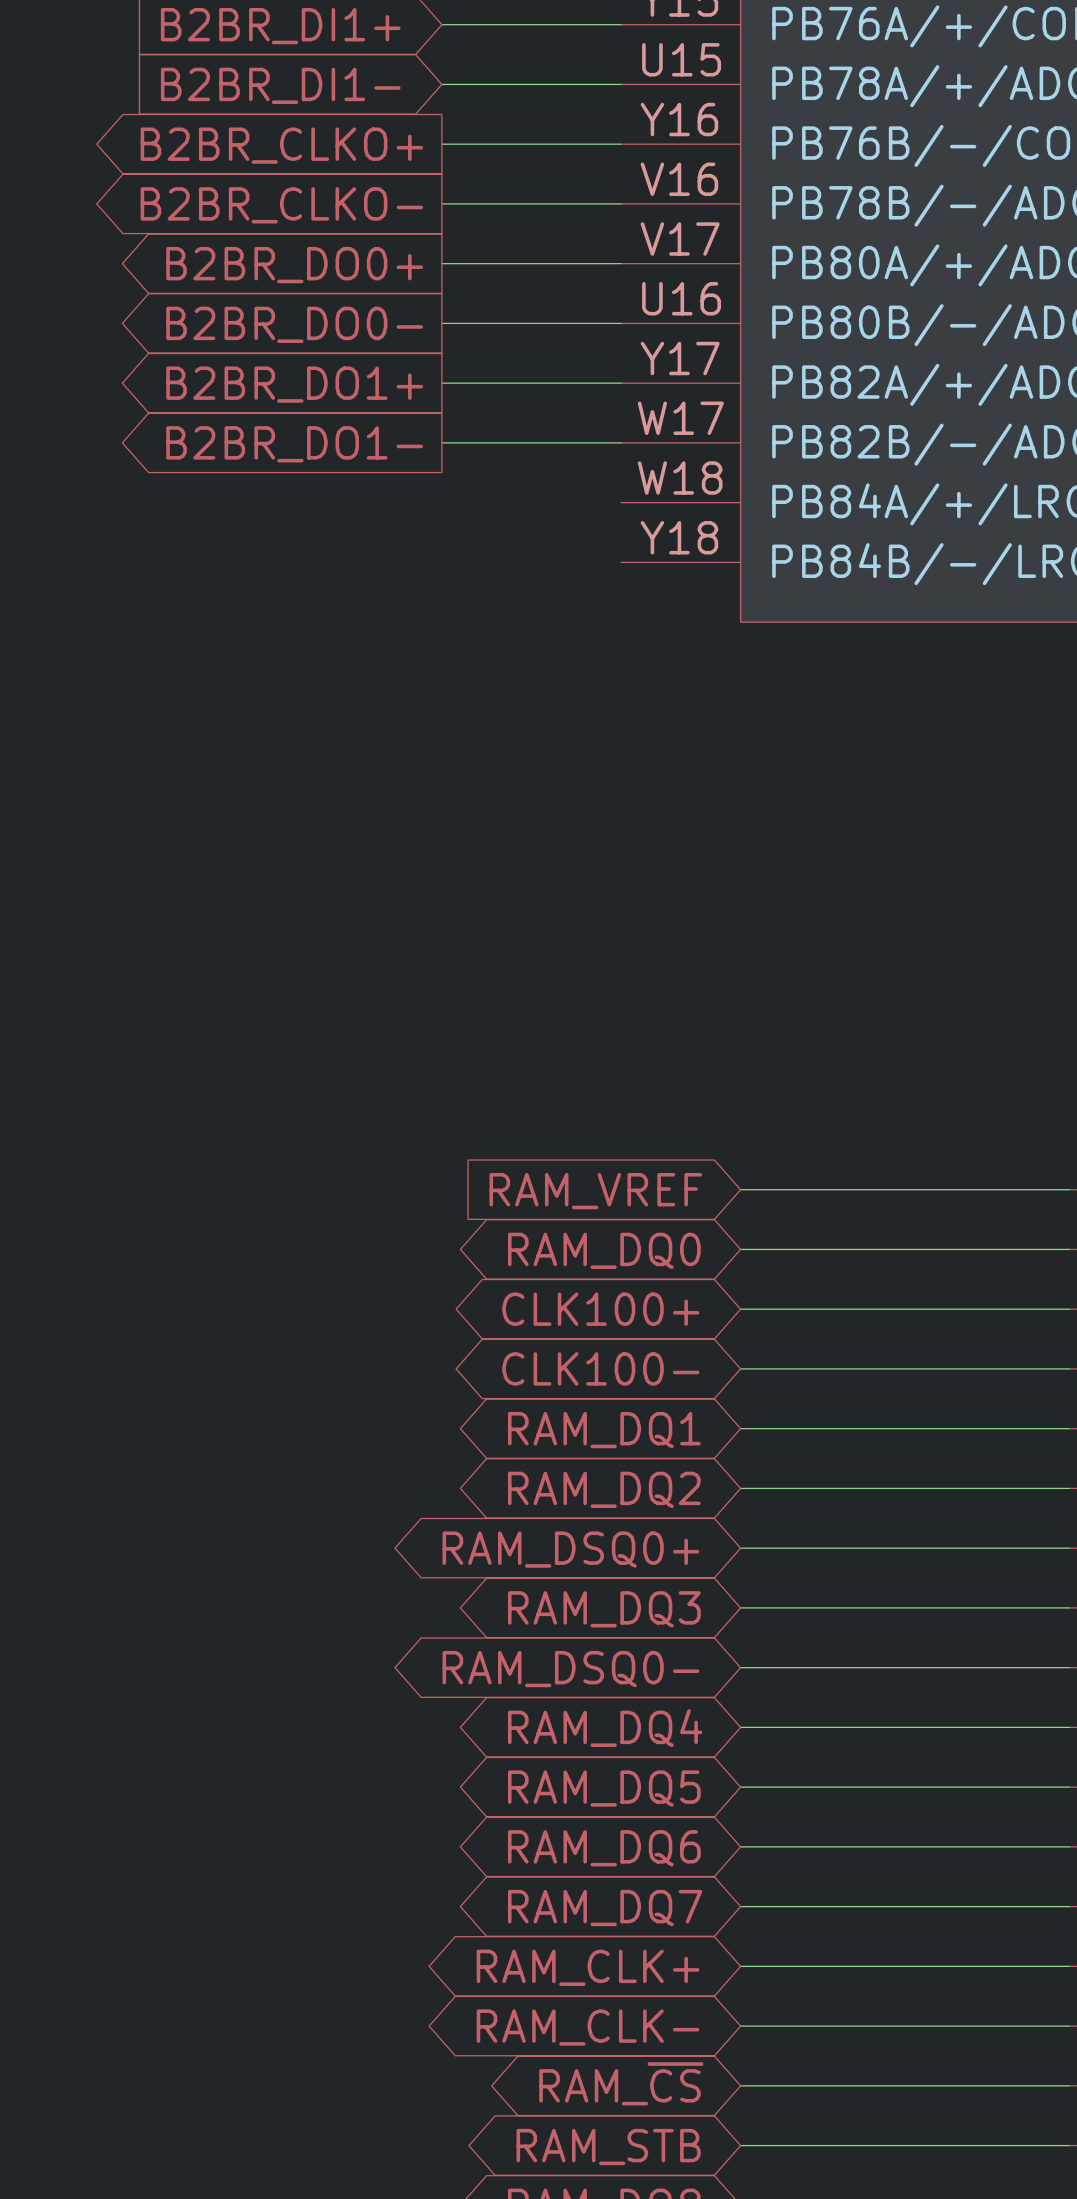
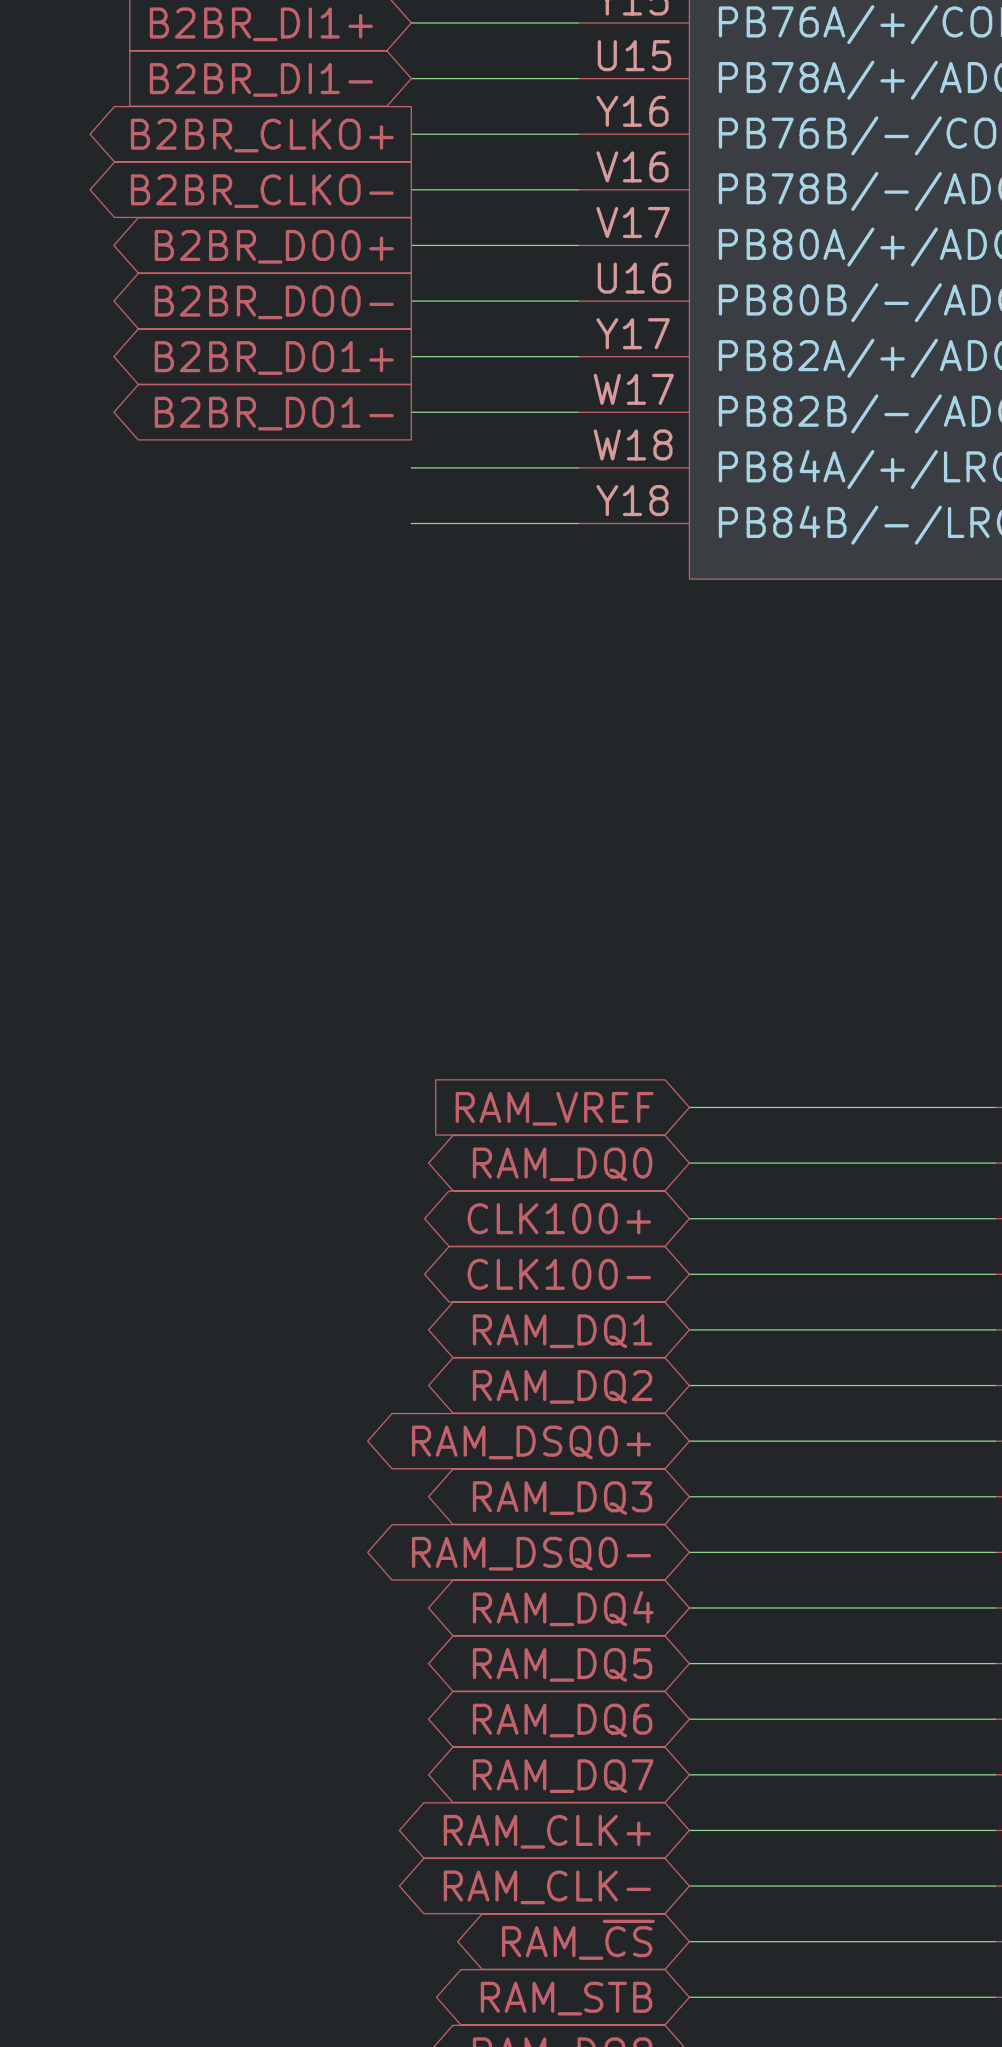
wire: none -> (411, 467) (578, 467)
wire: none -> (411, 523) (578, 523)

